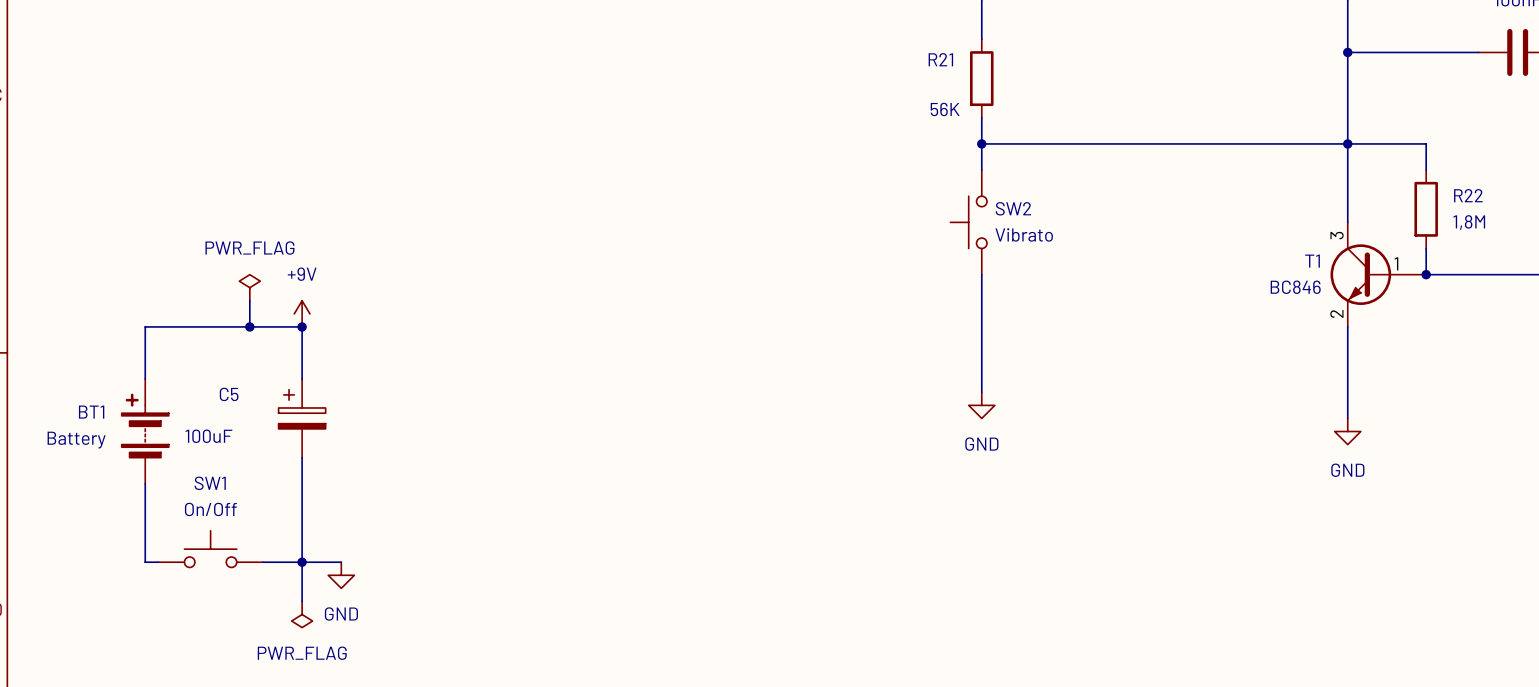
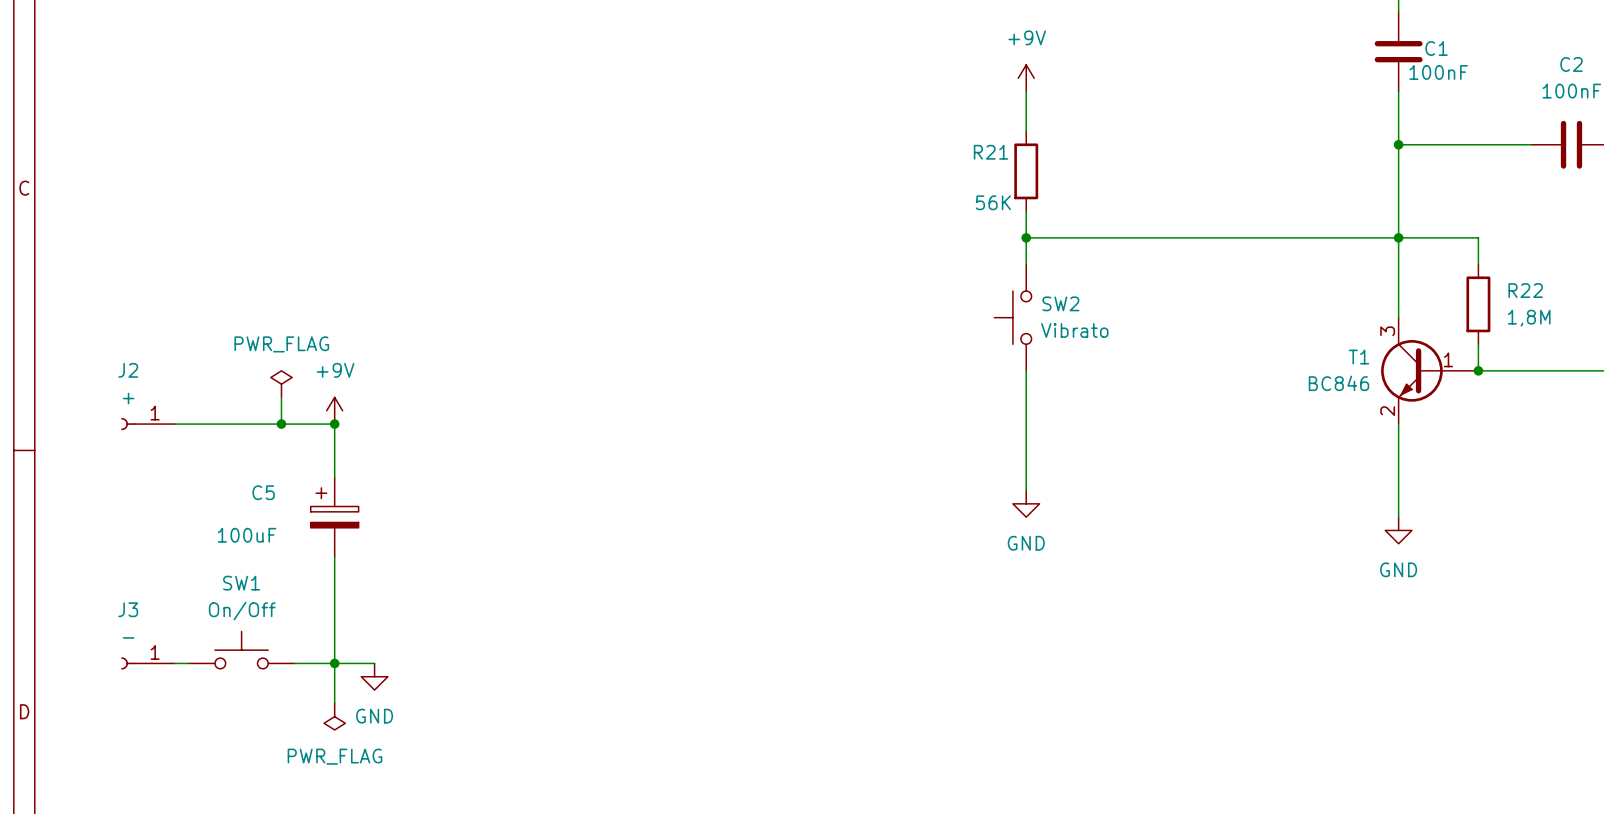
J2: none -> + (148, 424)
wire: (145, 326) (145, 379) -> none
BT1: Battery (145, 431) -> none
wire: (145, 483) (145, 562) -> none
J3: none -> - (148, 663)

